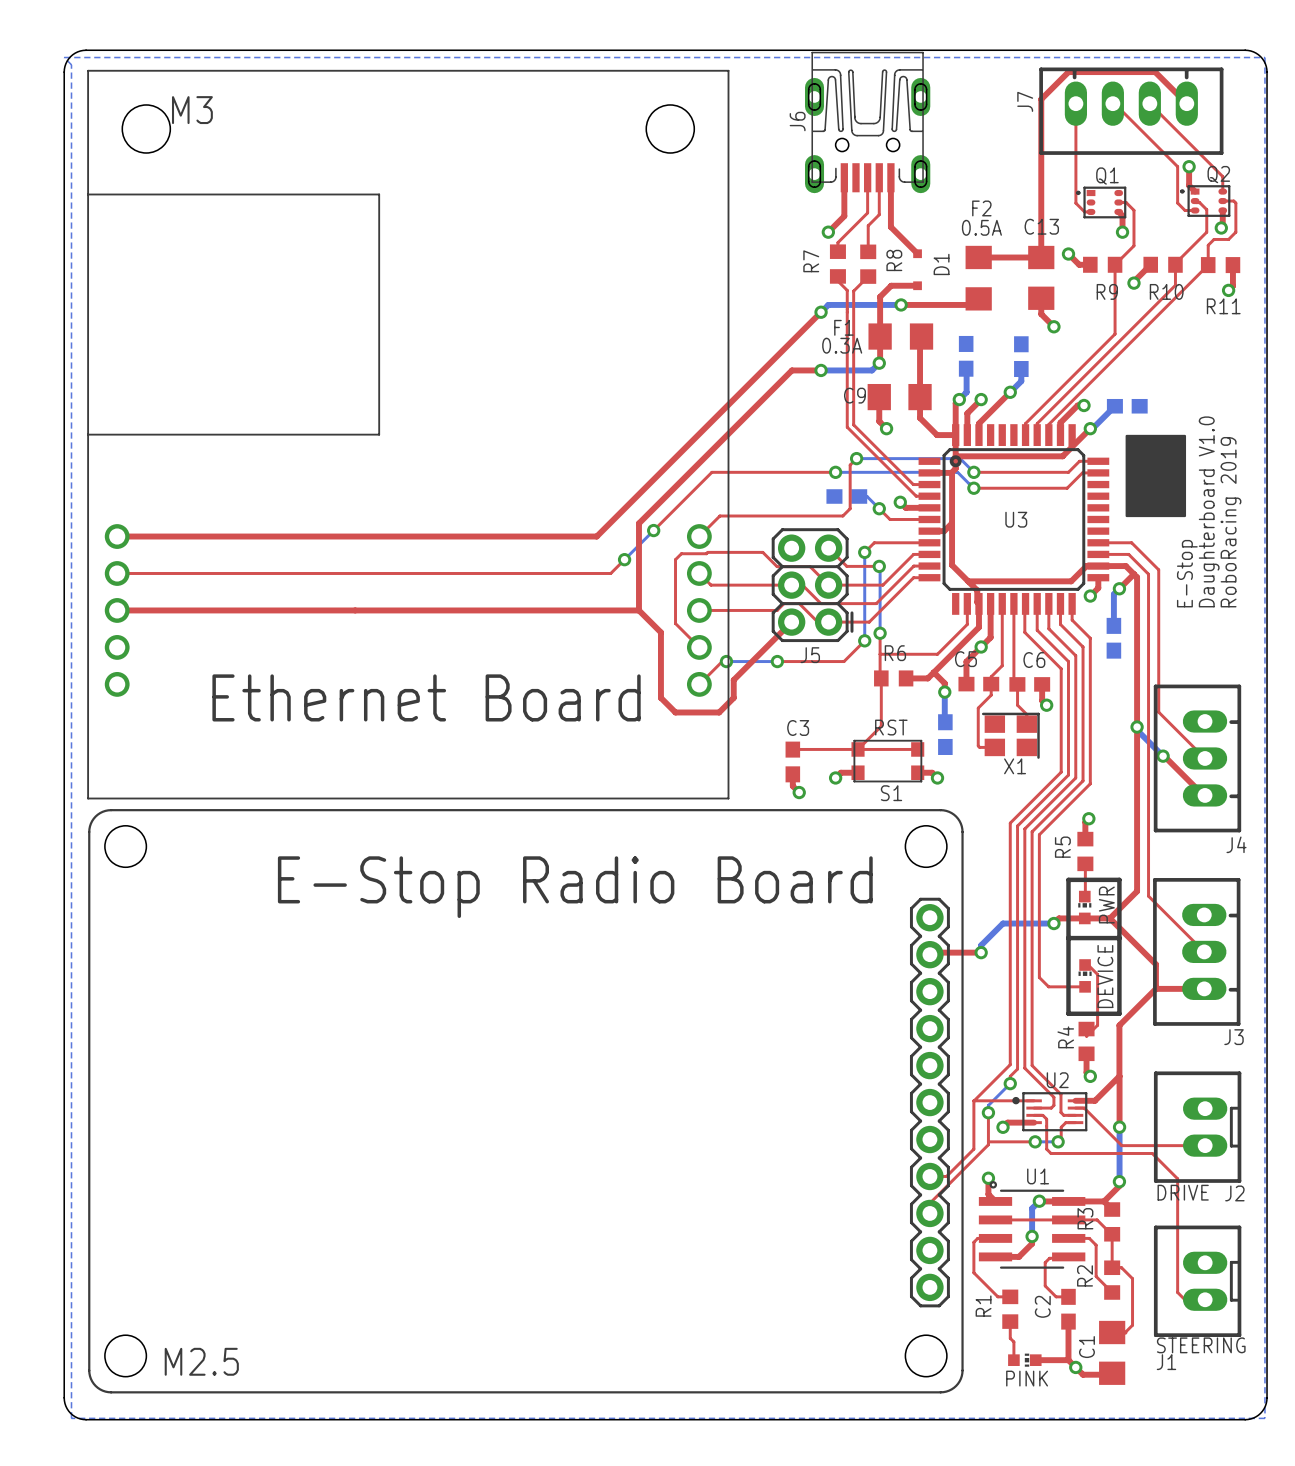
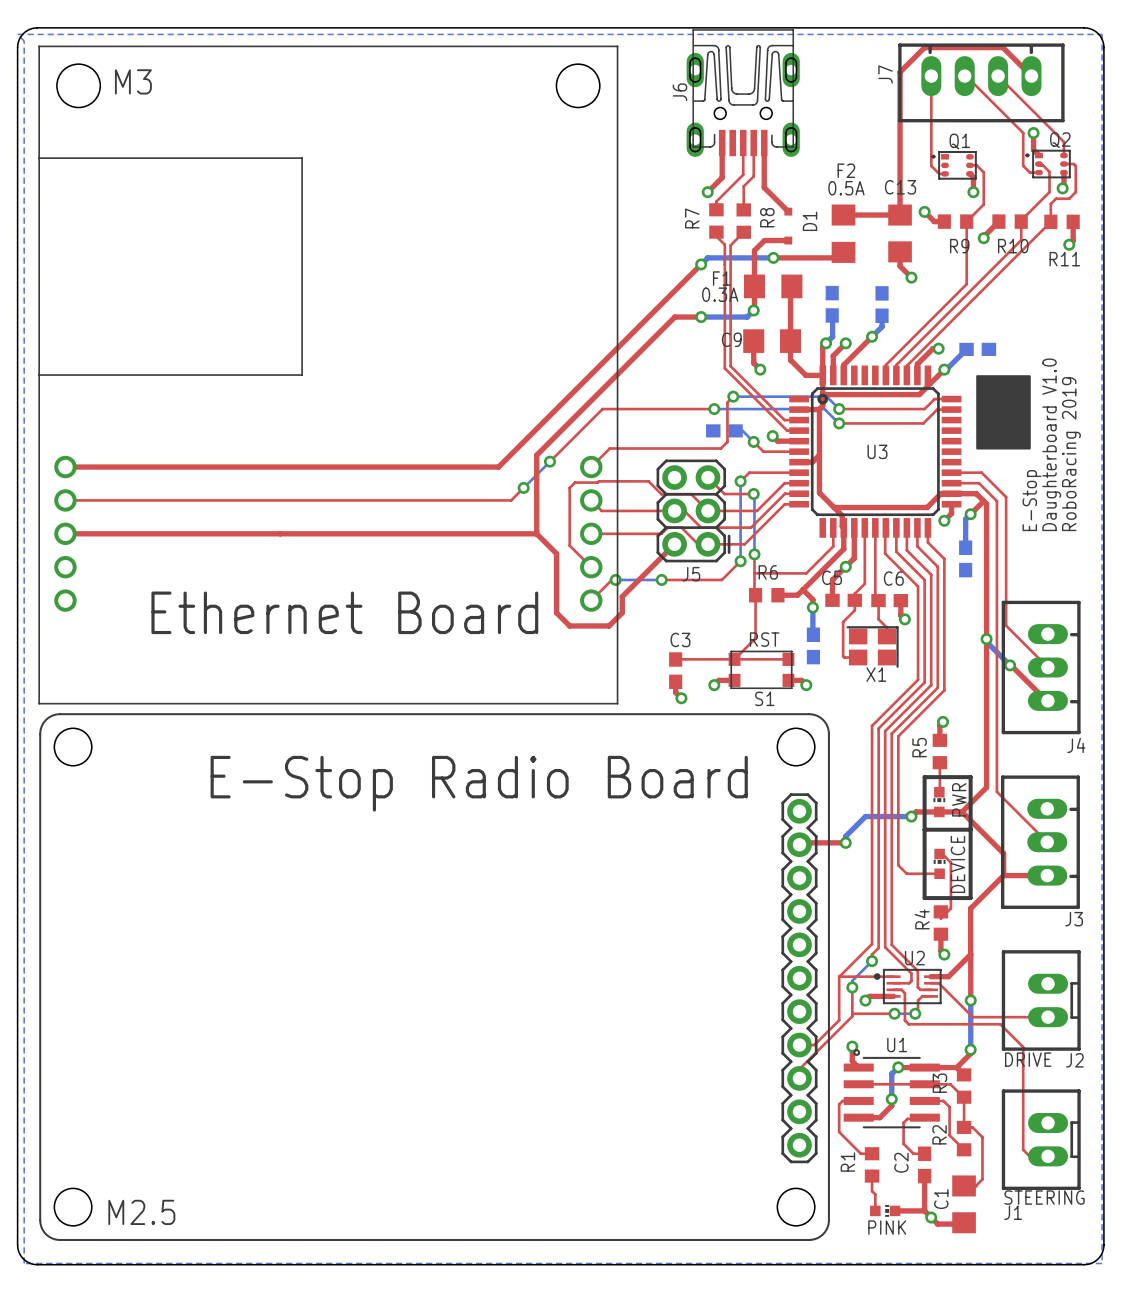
part footprint: [87, 69, 730, 800] -> [38, 45, 619, 705]

